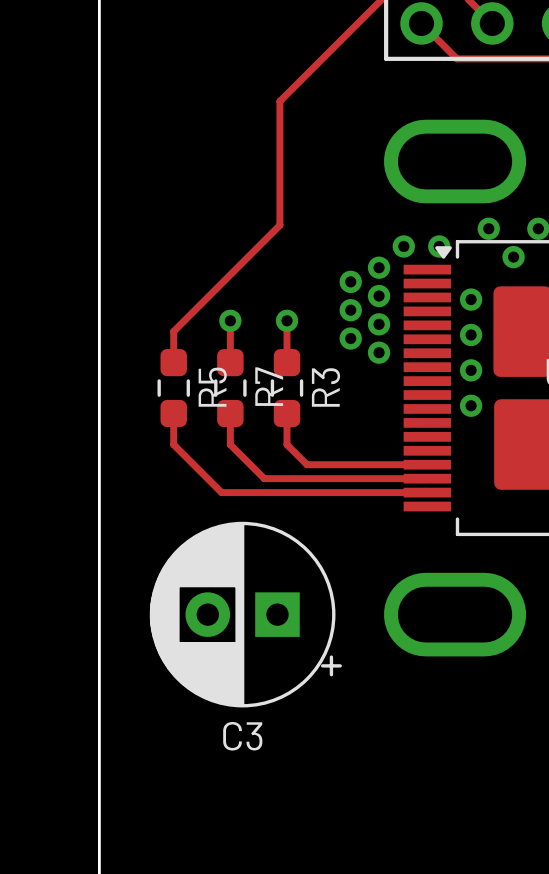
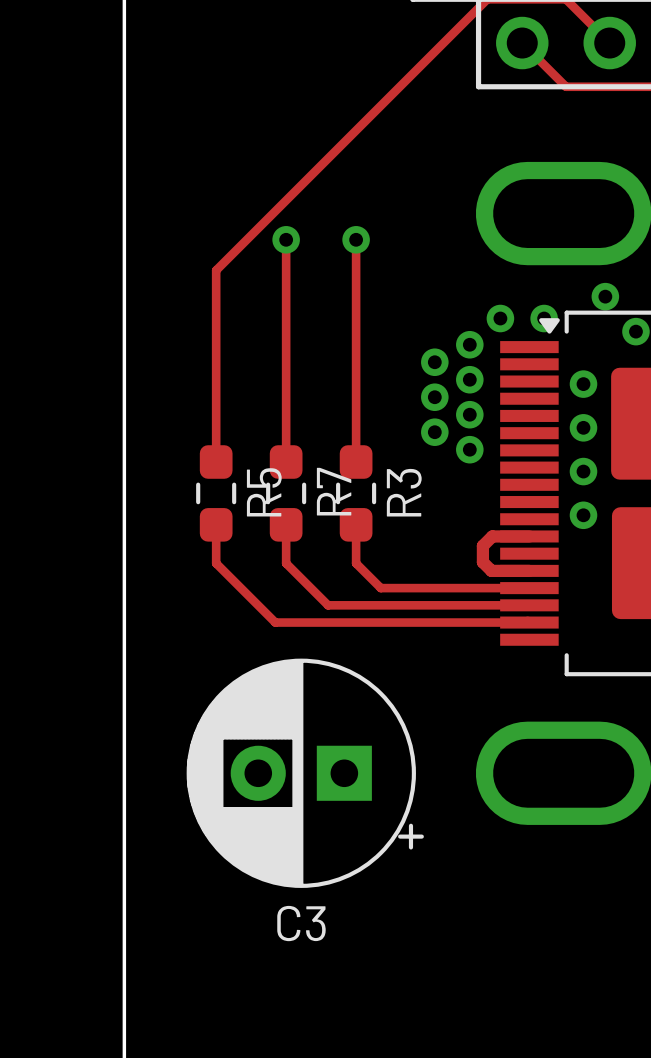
track: (279, 101) (279, 225) (173, 331) -> (347, 139) (216, 270) (216, 423)
track: none -> (286, 239) (286, 410)
via: none -> (286, 239)
track: none -> (356, 239) (356, 410)
via: none -> (356, 239)
via: (230, 320) -> none
via: (287, 320) -> none
track: none -> (529, 536) (492, 536) (482, 545) (482, 562) (491, 570) (529, 570)

